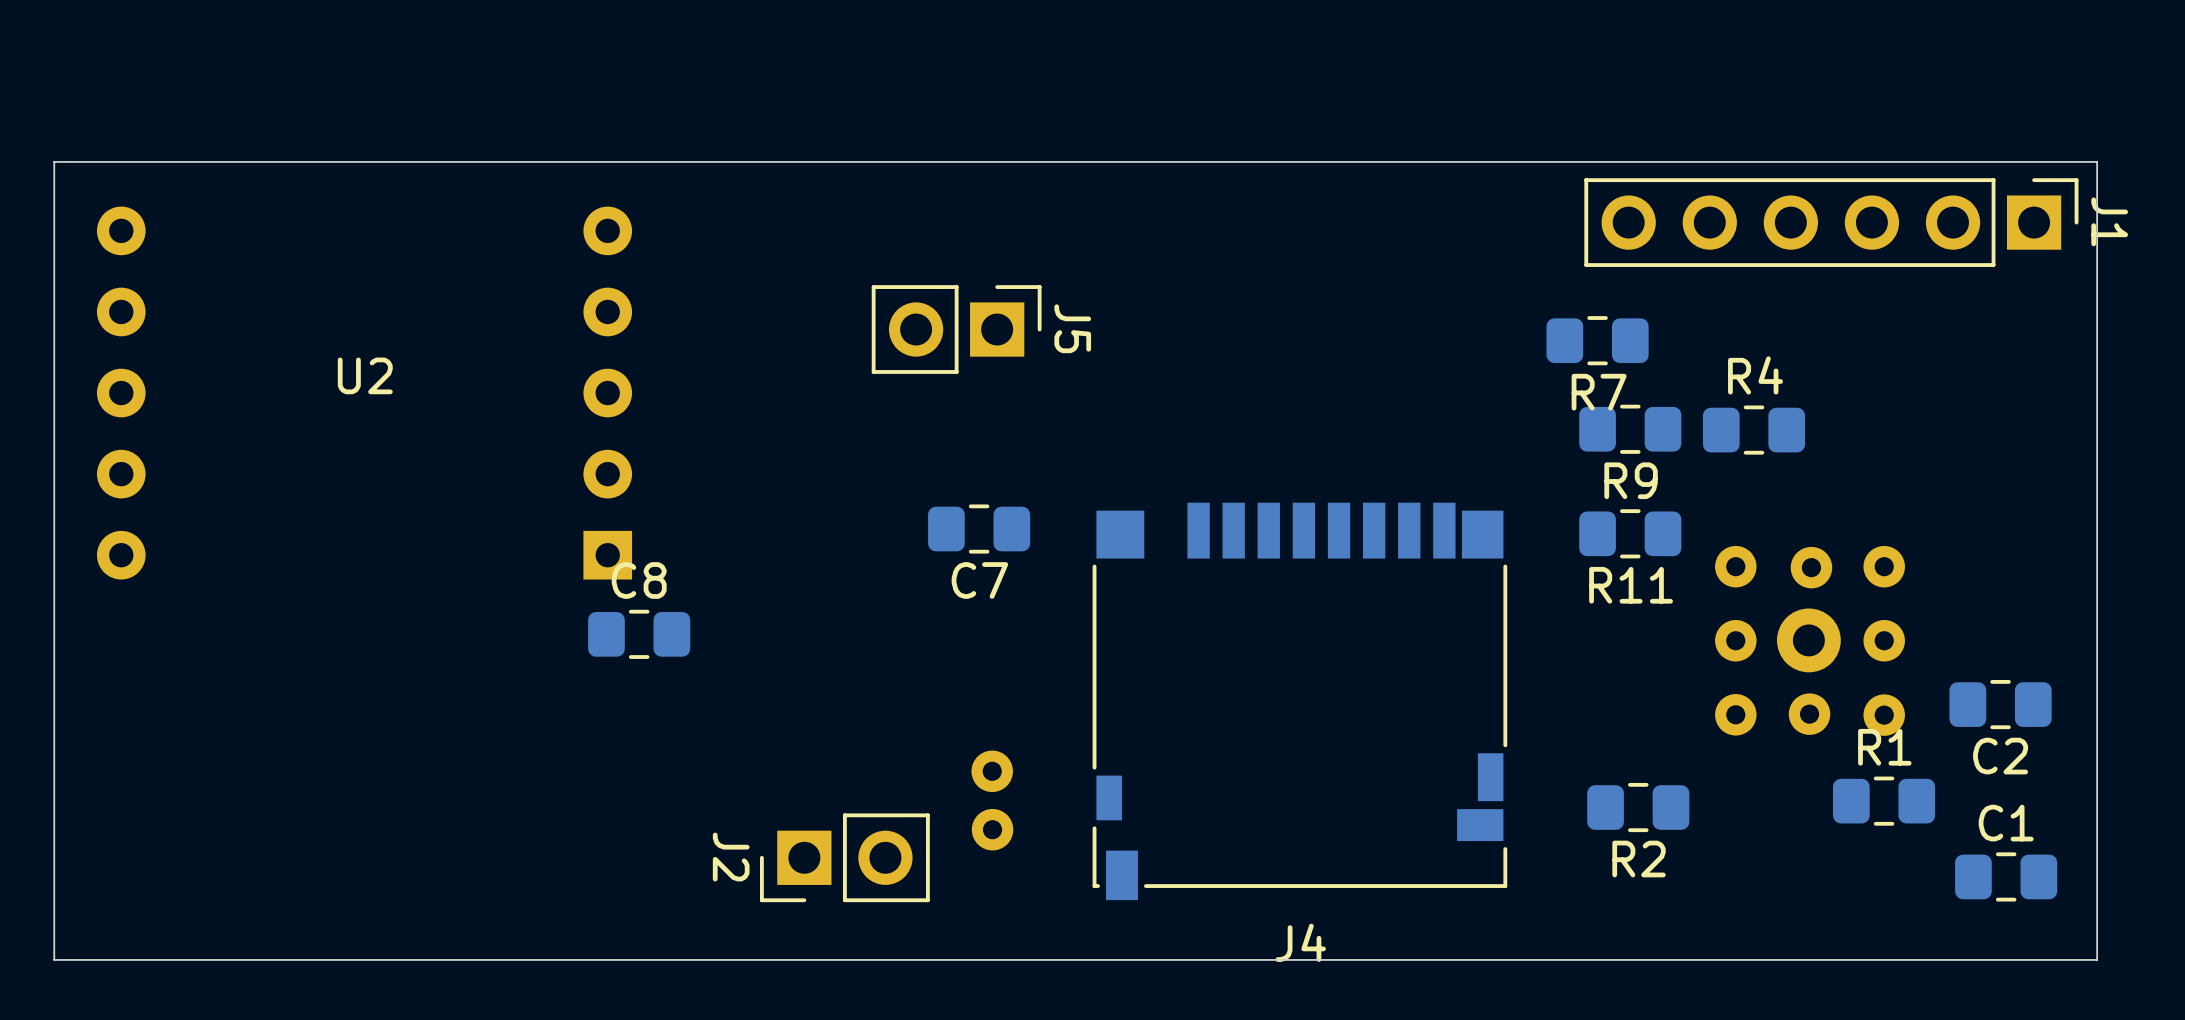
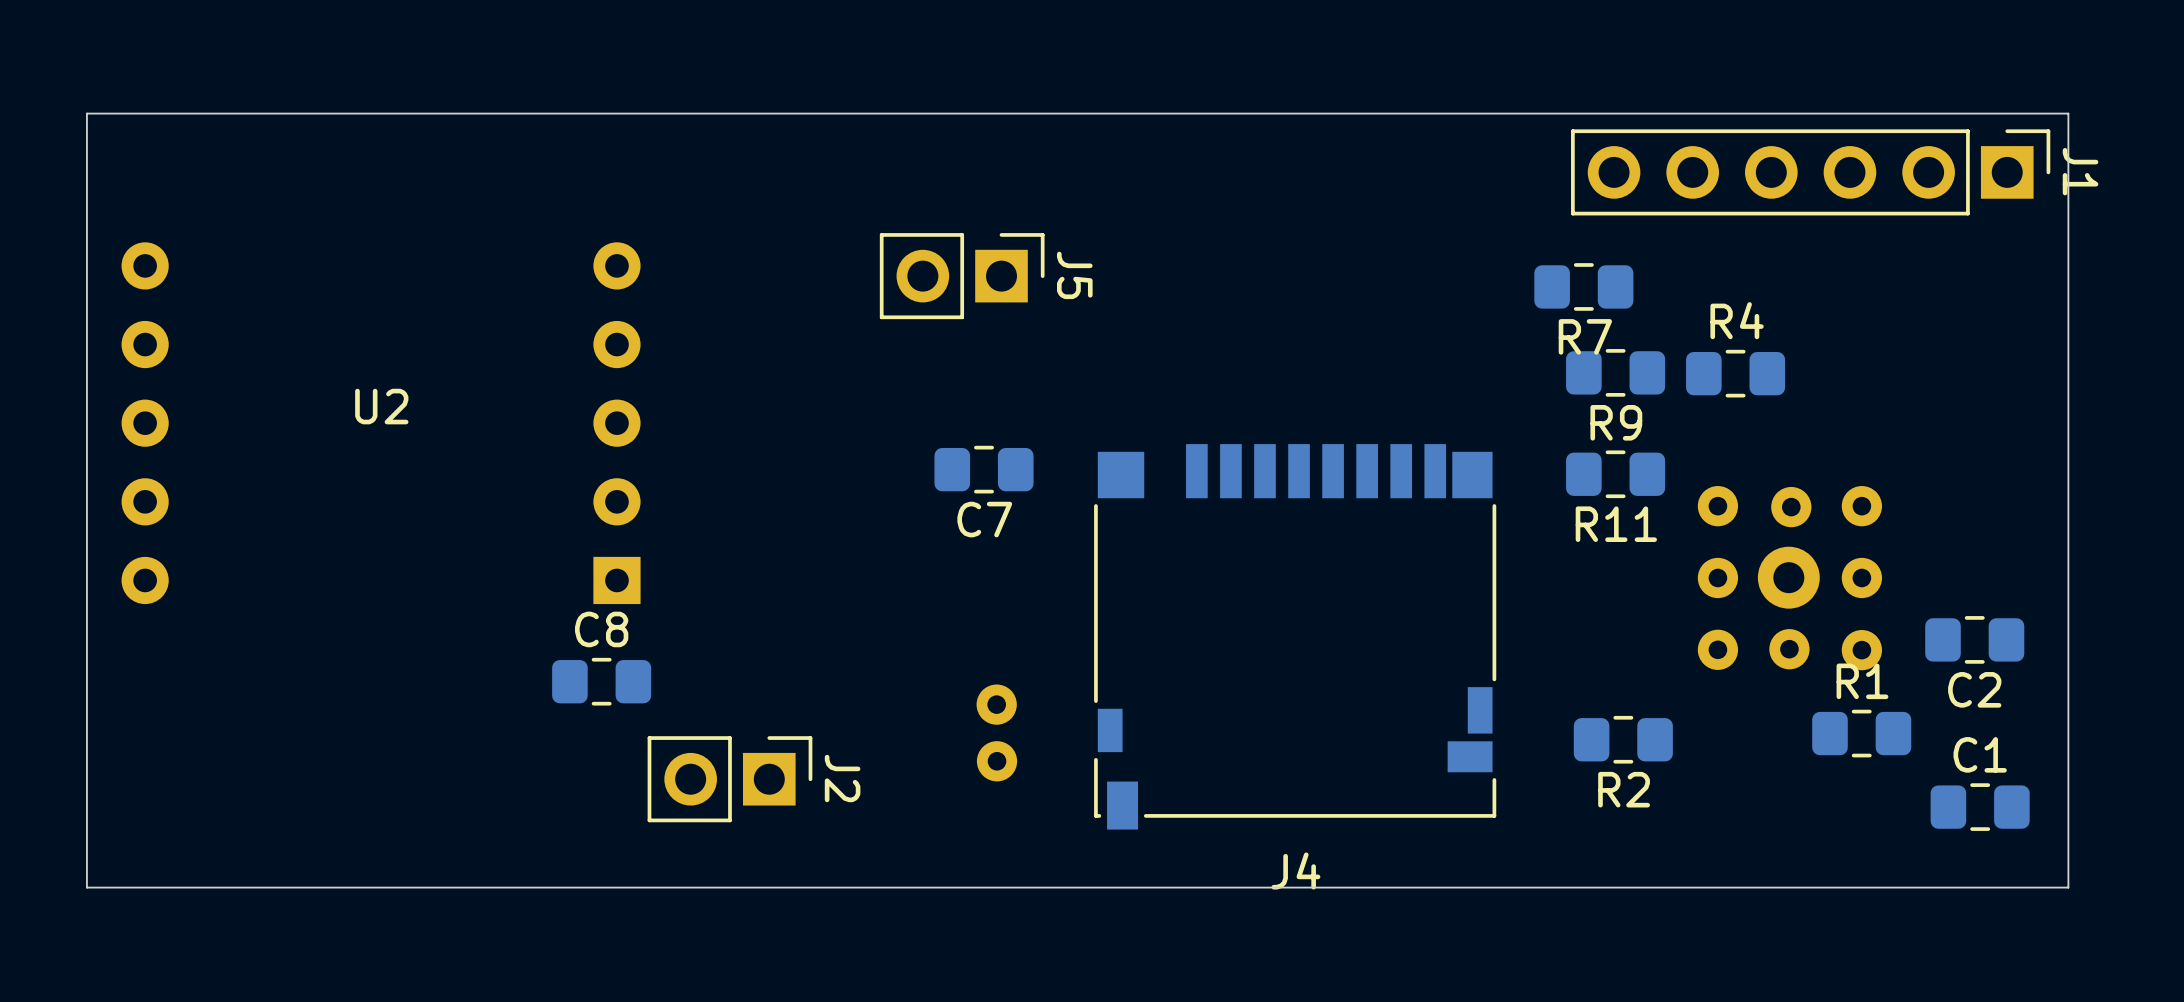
U2 position: (364, 393) -> (381, 423)
C8 position: (639, 634) -> (601, 681)
J2 rotation: 0° (844, 857) -> 180° (729, 779)
J2 position: (844, 857) -> (729, 779)

